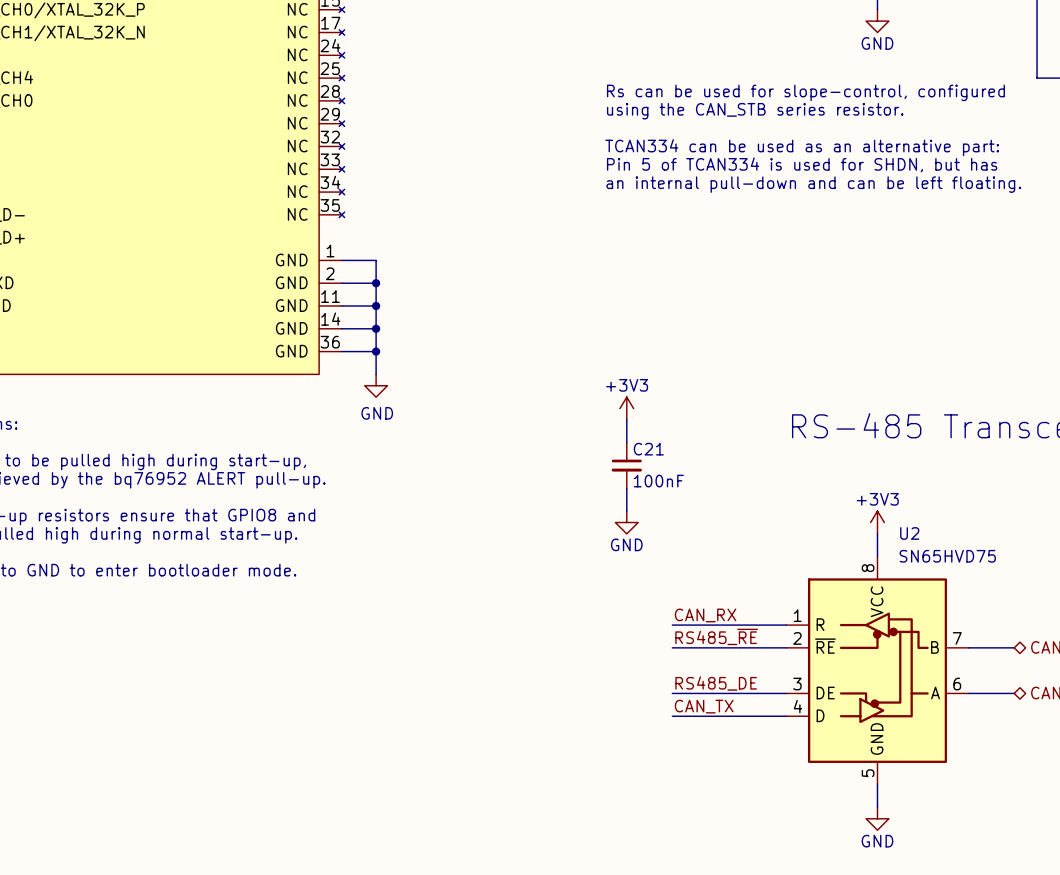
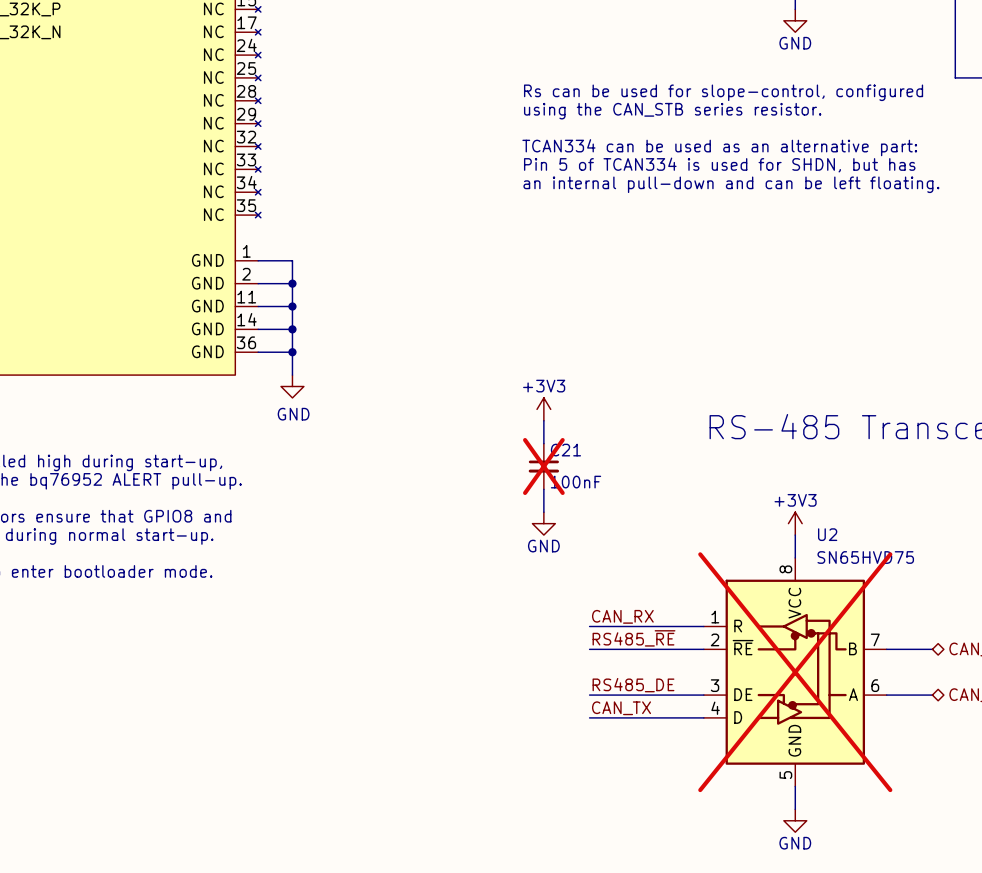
C21 do-not-place cross: none -> (543, 466)
U2 do-not-place cross: none -> (795, 672)

